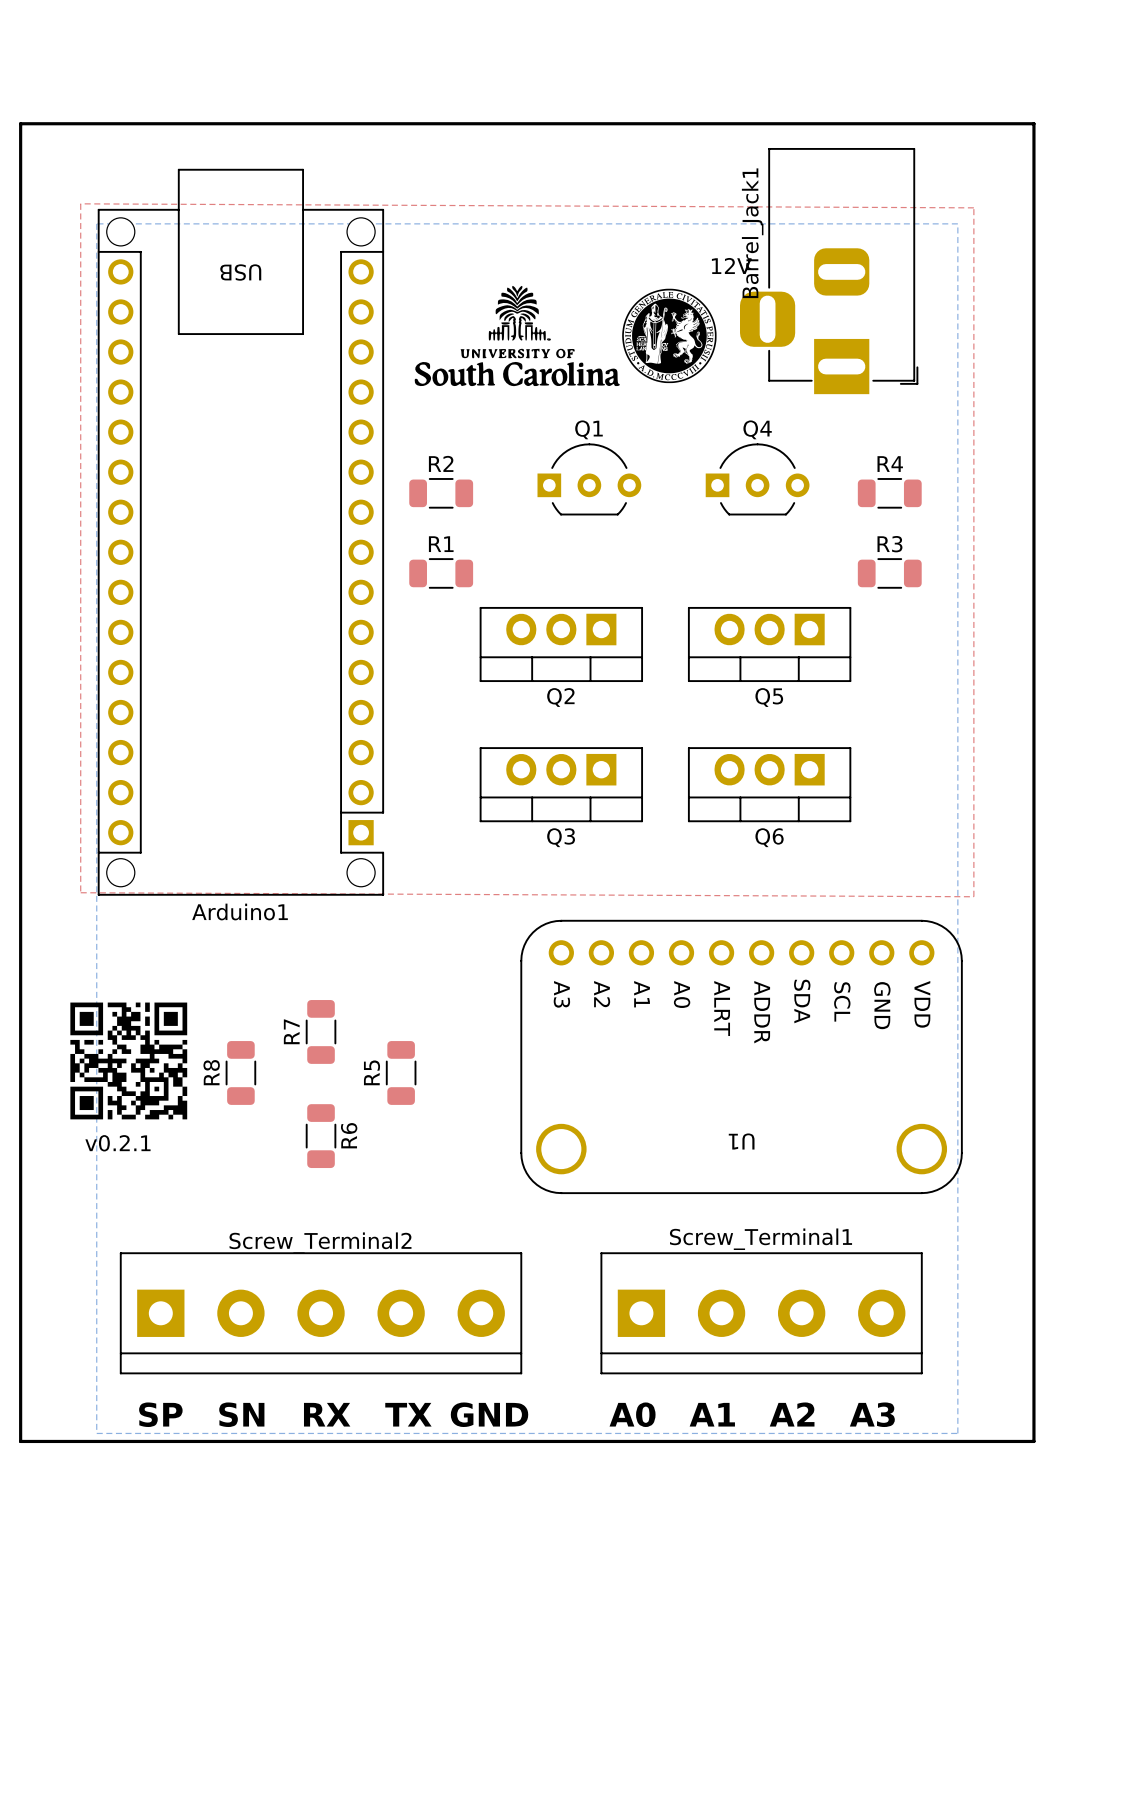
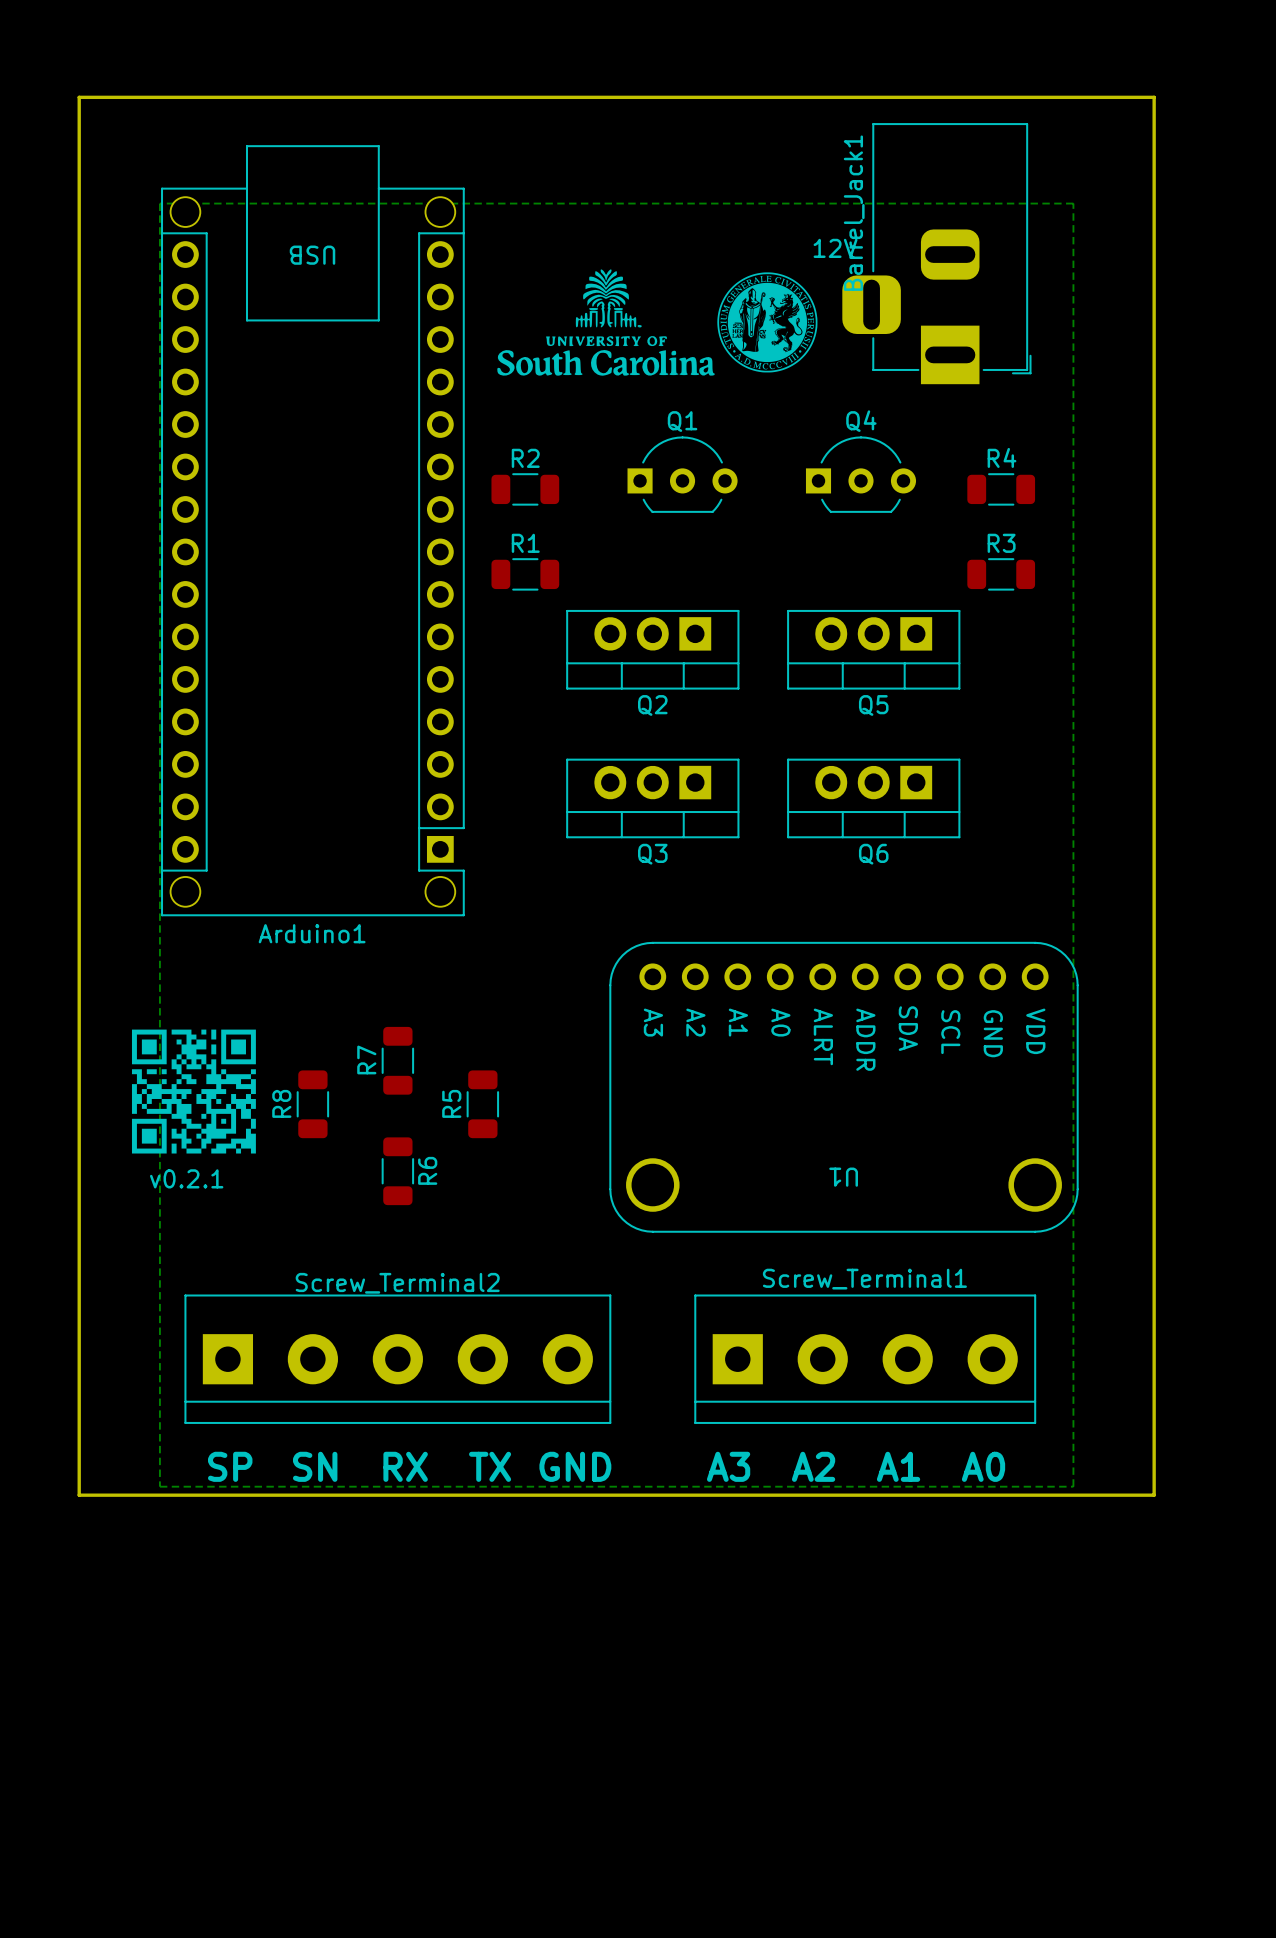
top zone outline: (80, 203) (80, 892) (973, 896) (973, 207) (80, 203) -> none
text: A0 (632, 1414) -> A3 (728, 1466)
text: A1 (712, 1414) -> A2 (813, 1466)
text: A2 (792, 1414) -> A1 (898, 1466)
text: A3 (872, 1414) -> A0 (983, 1466)

